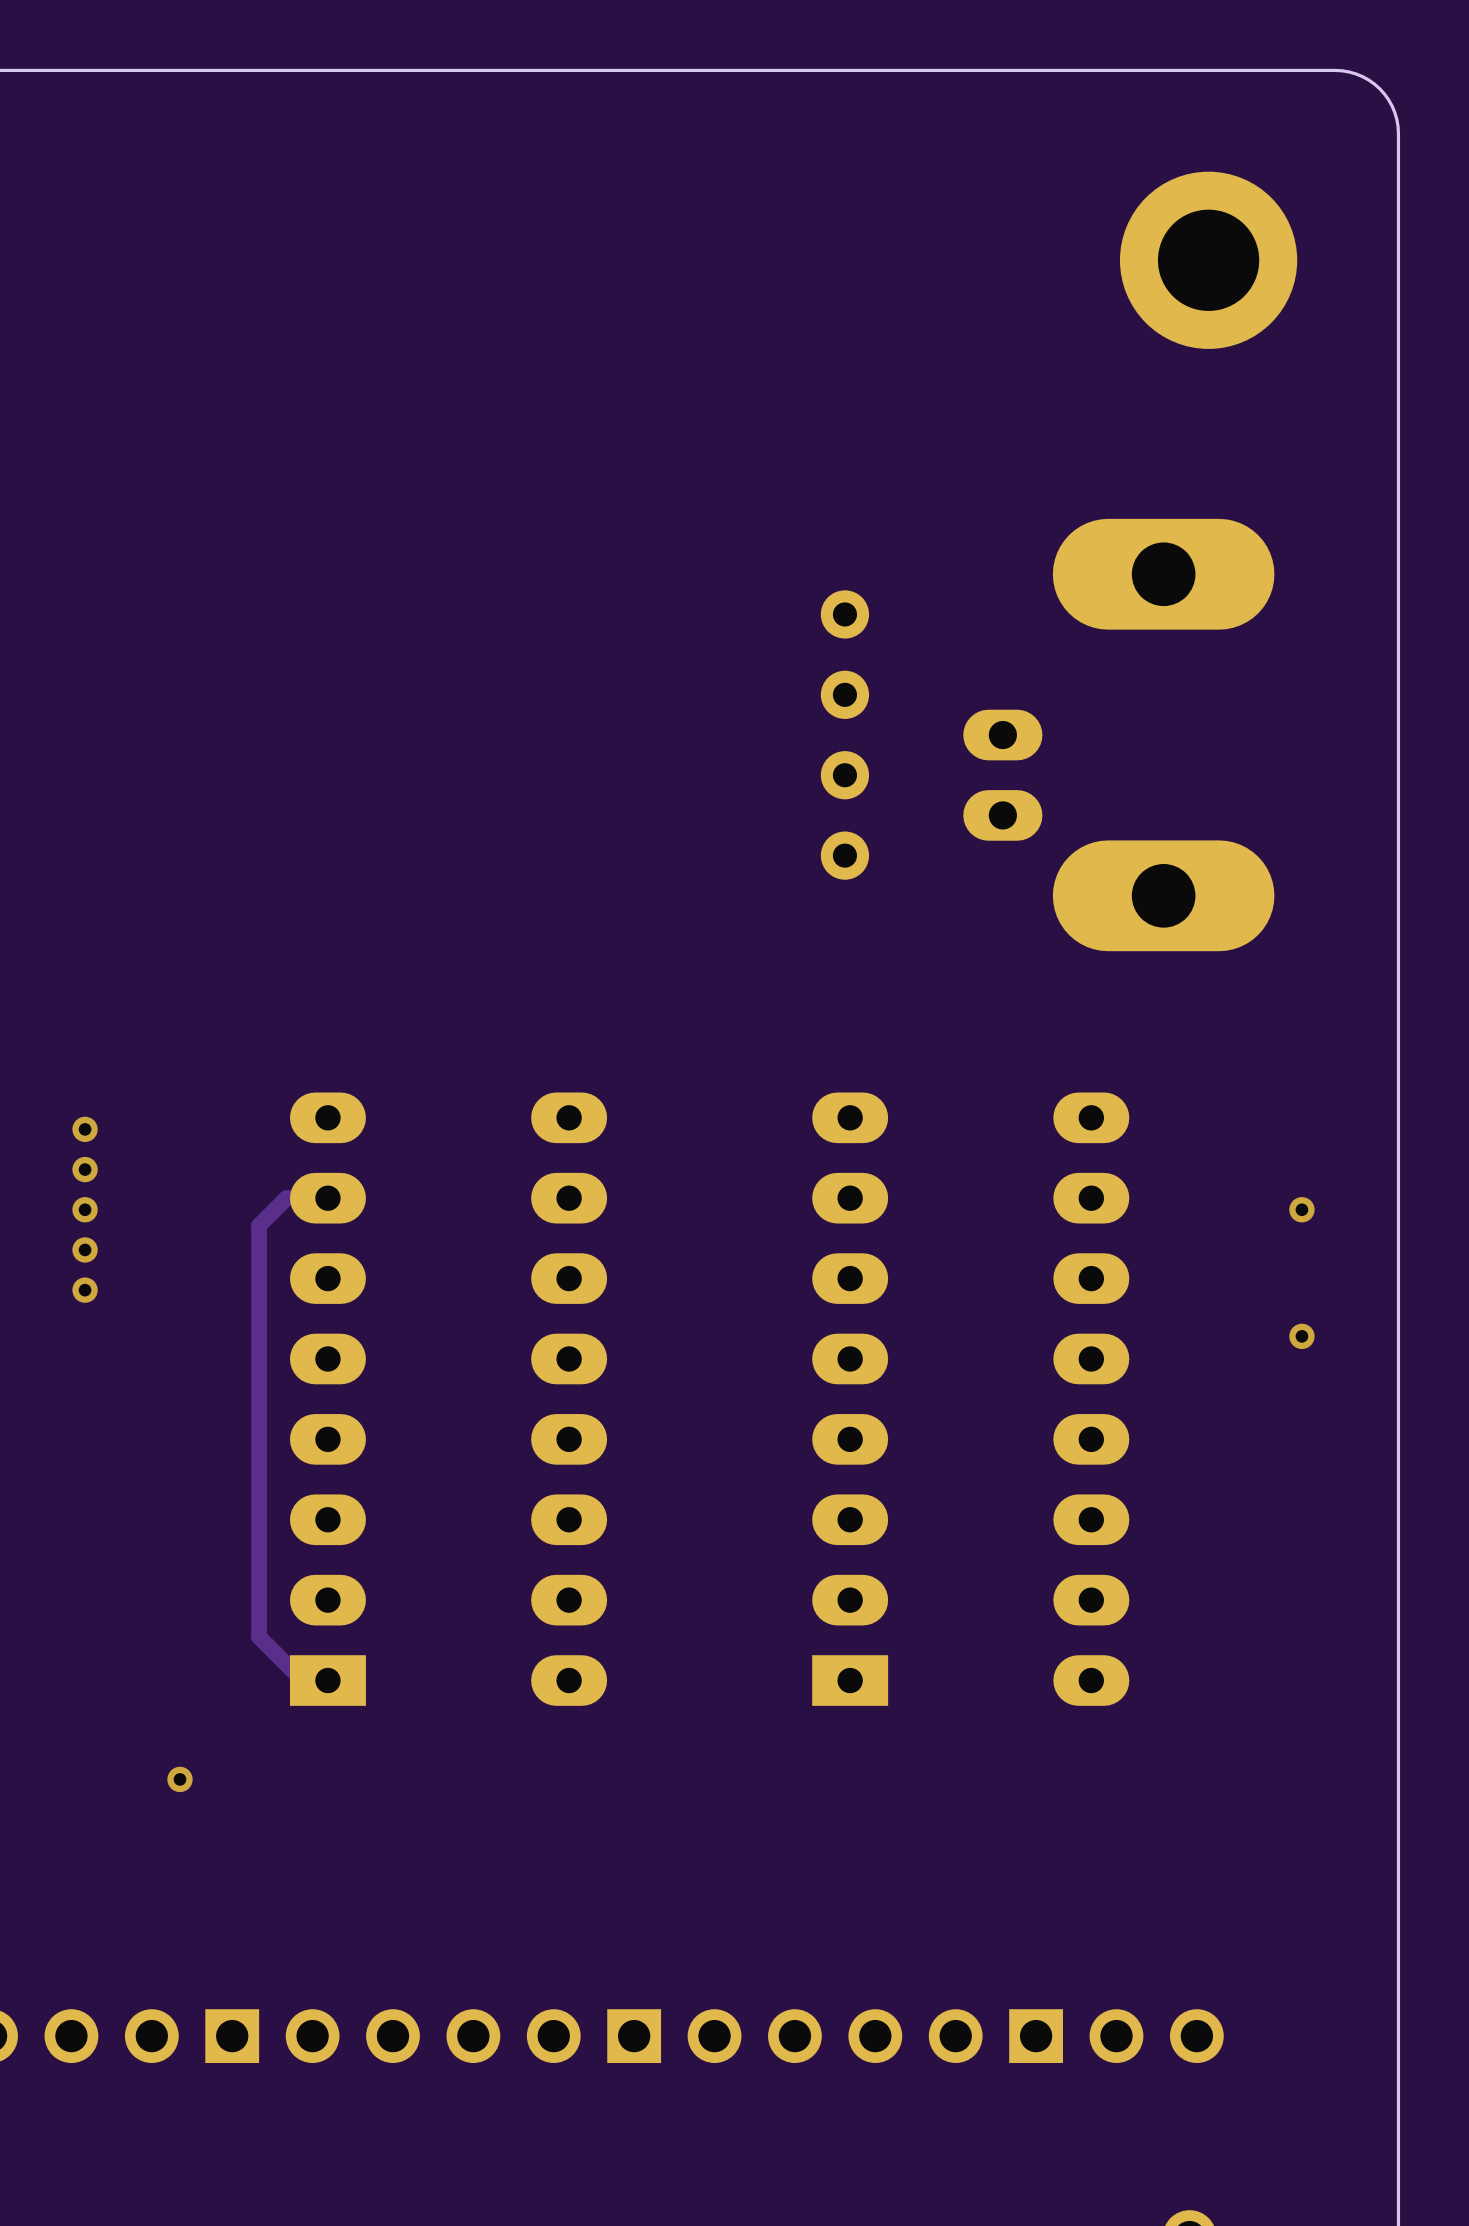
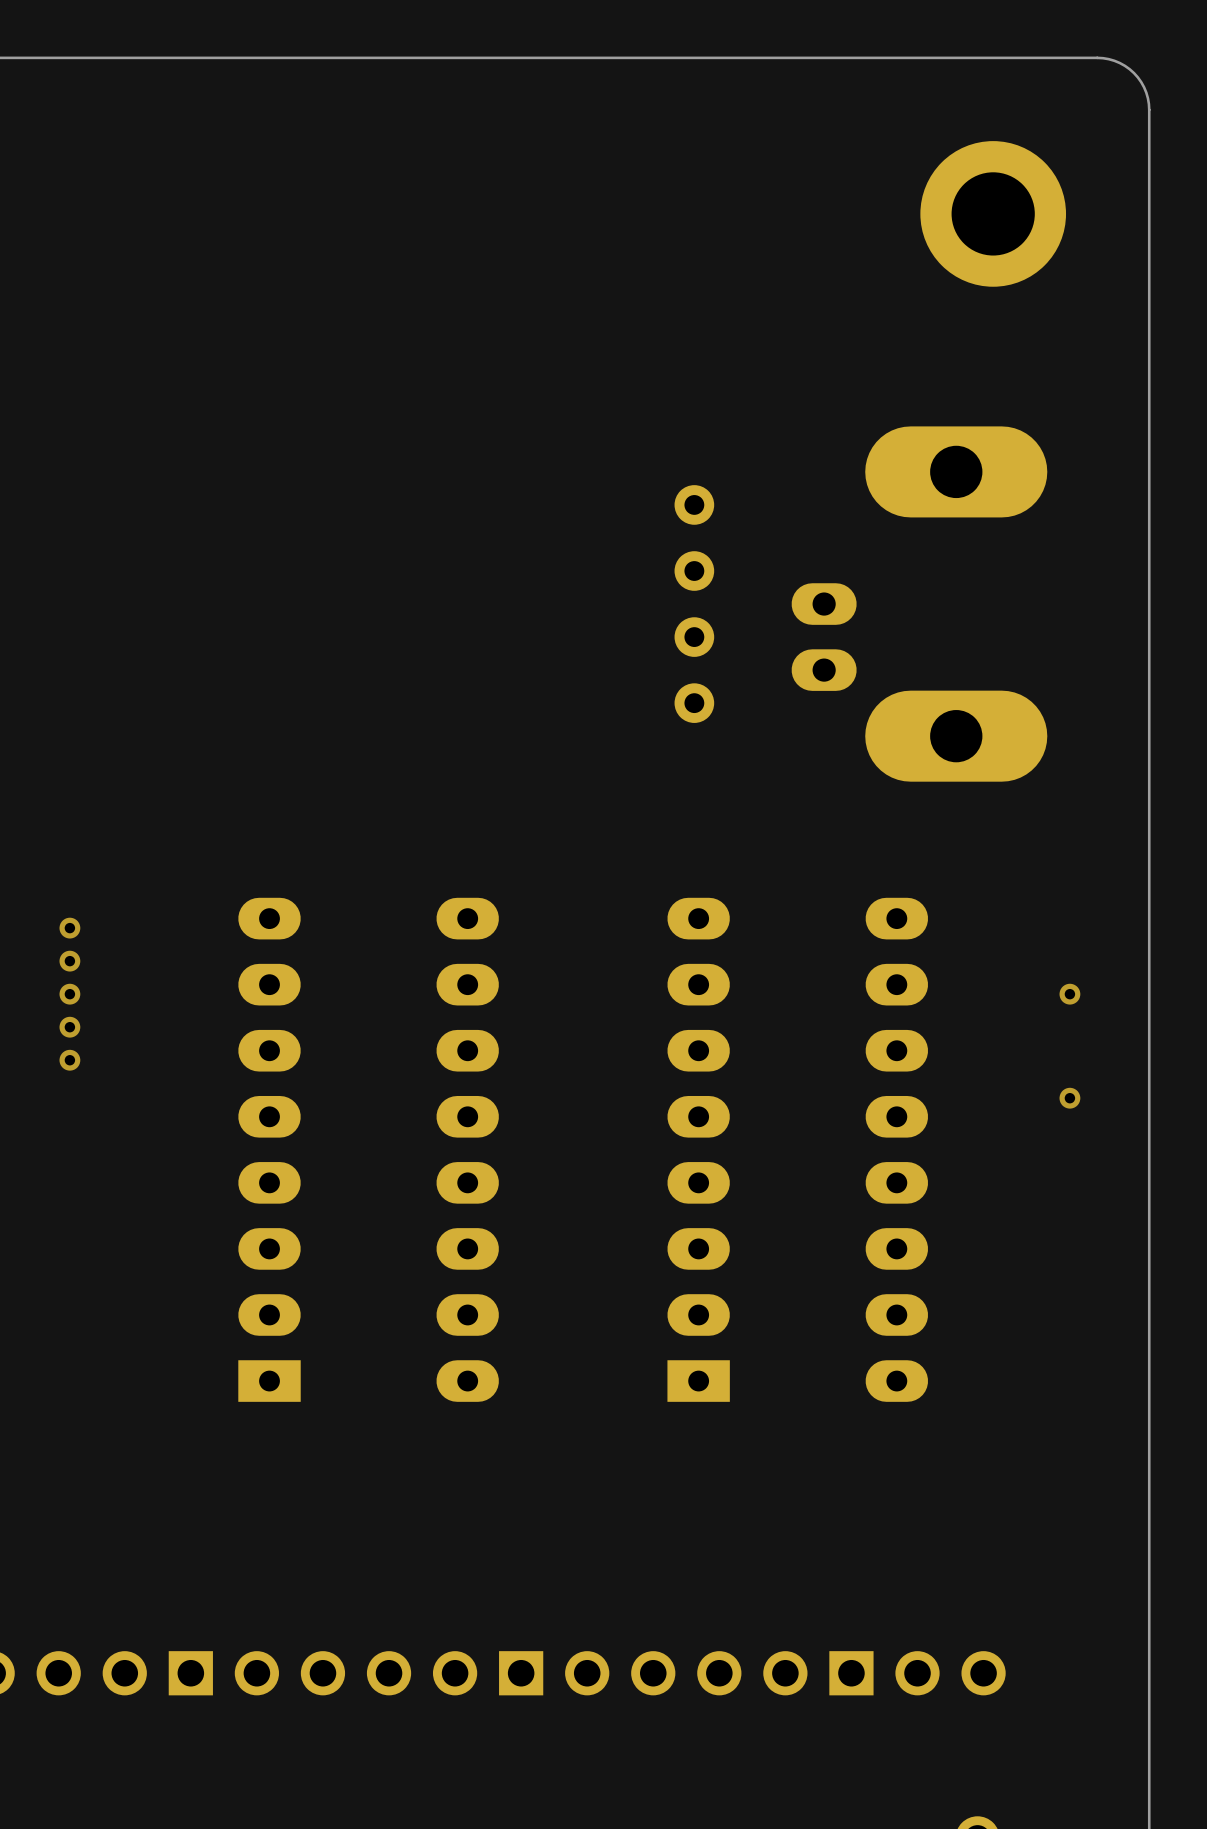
track: (327, 1198) (286, 1198) (259, 1225) (259, 1637) (302, 1680) (327, 1680) -> none
via: (180, 1779) -> none

